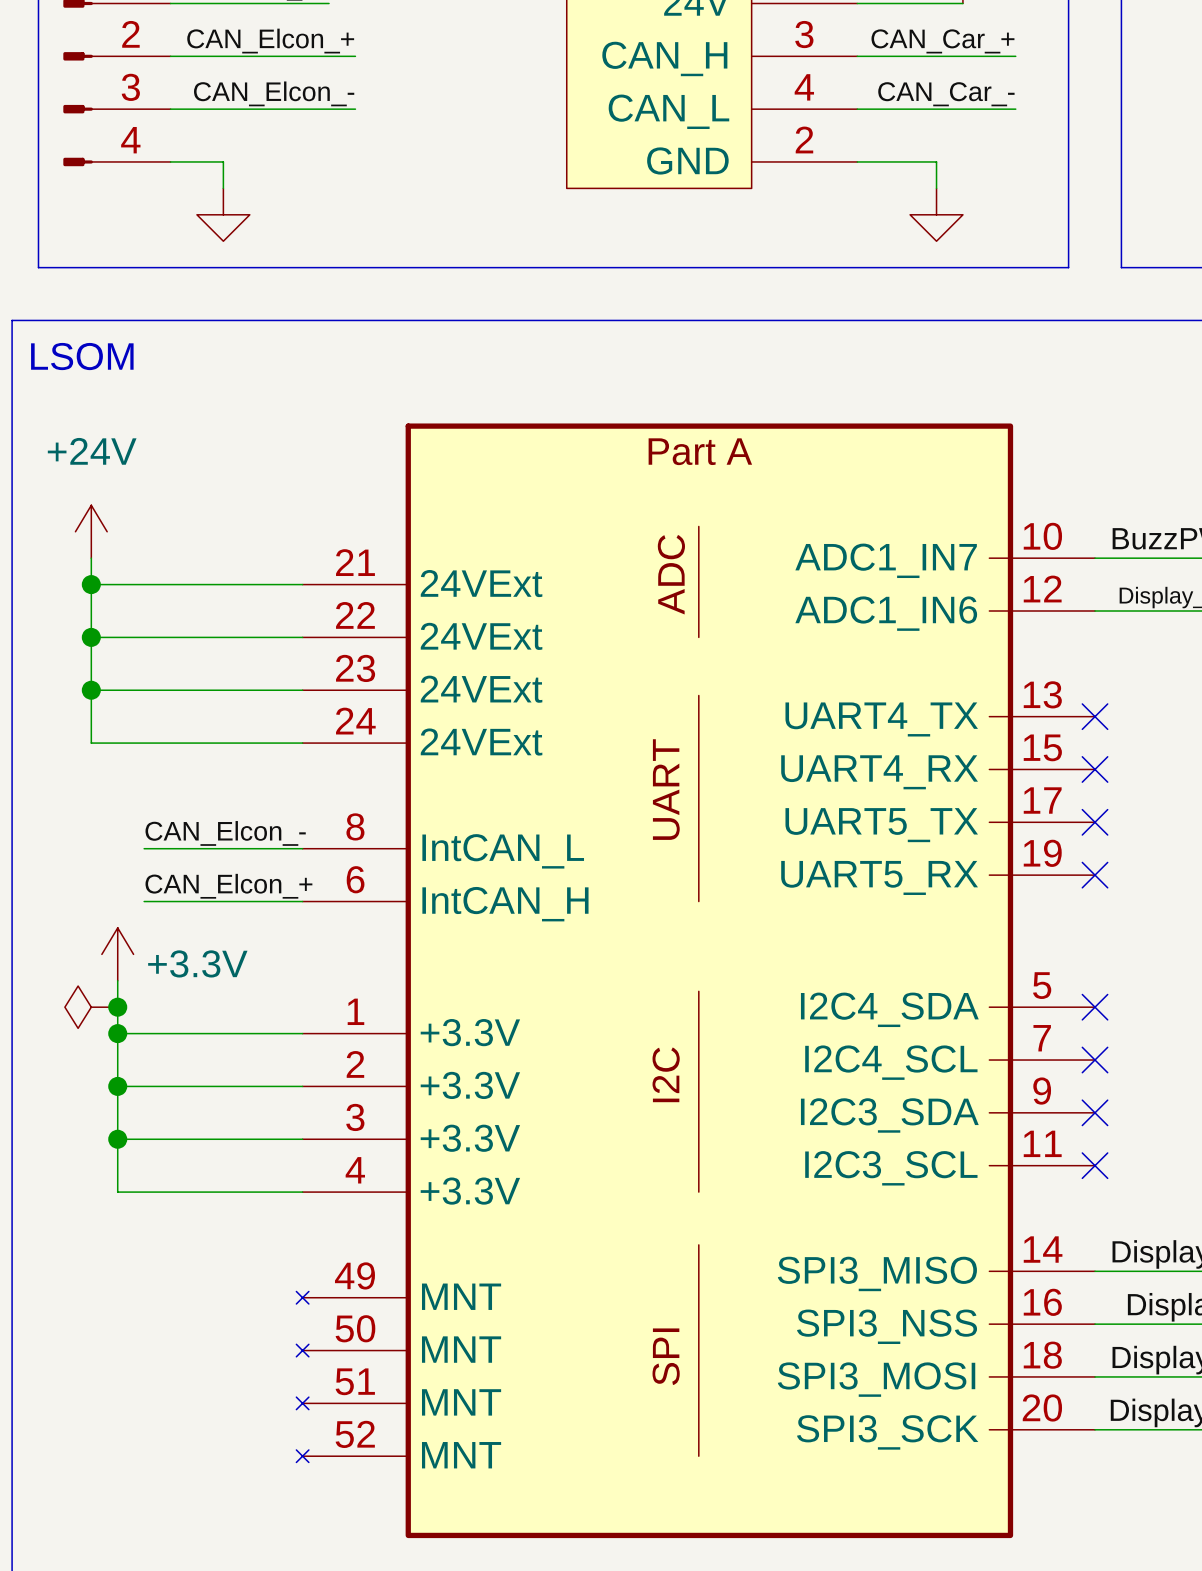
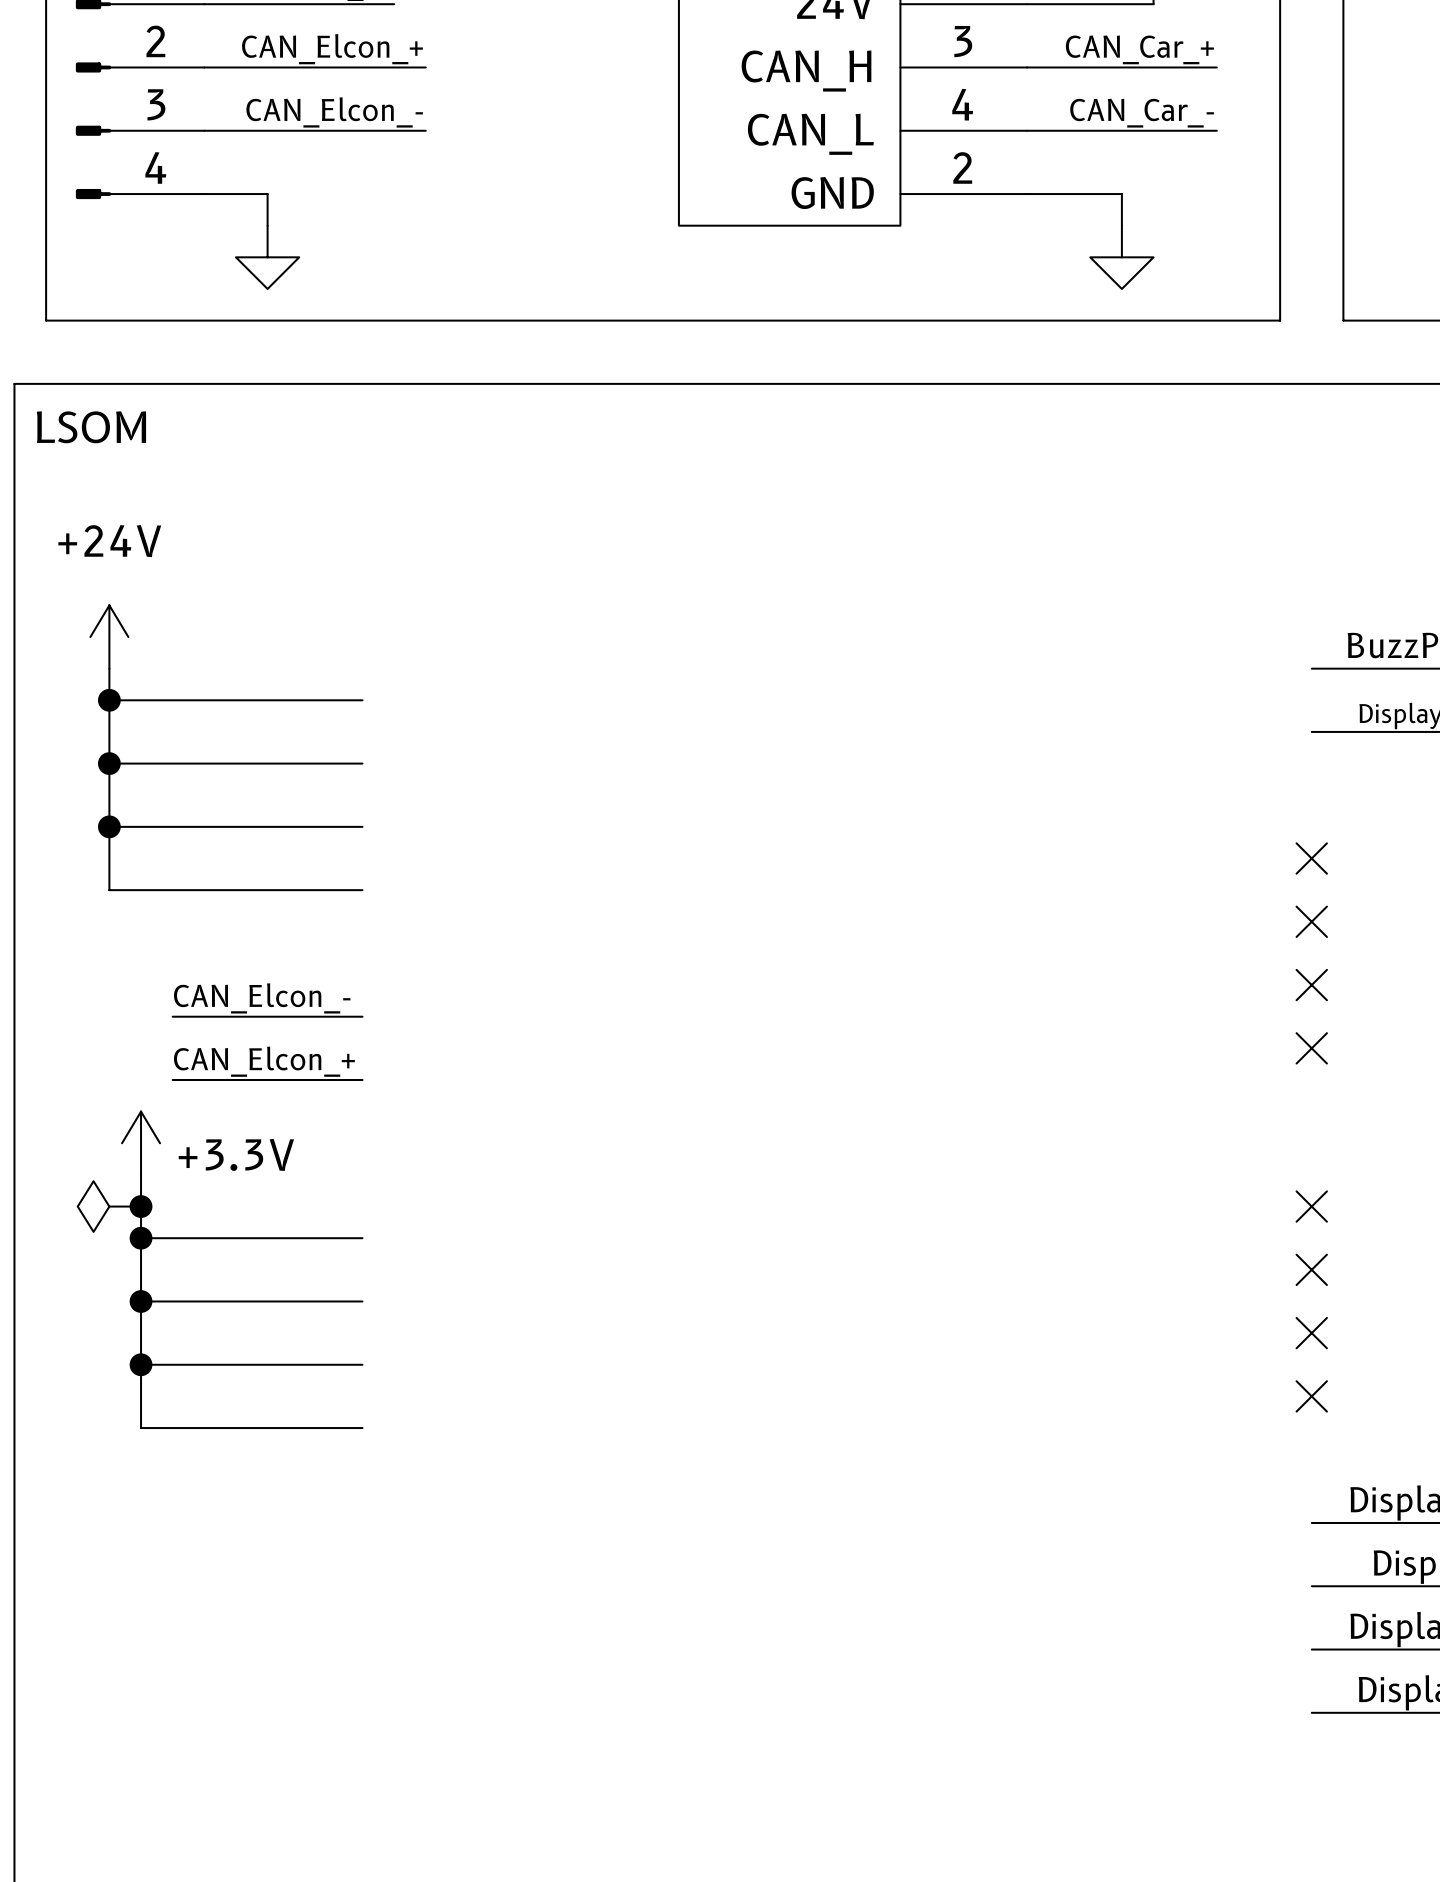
part: (695, 980) -> none

